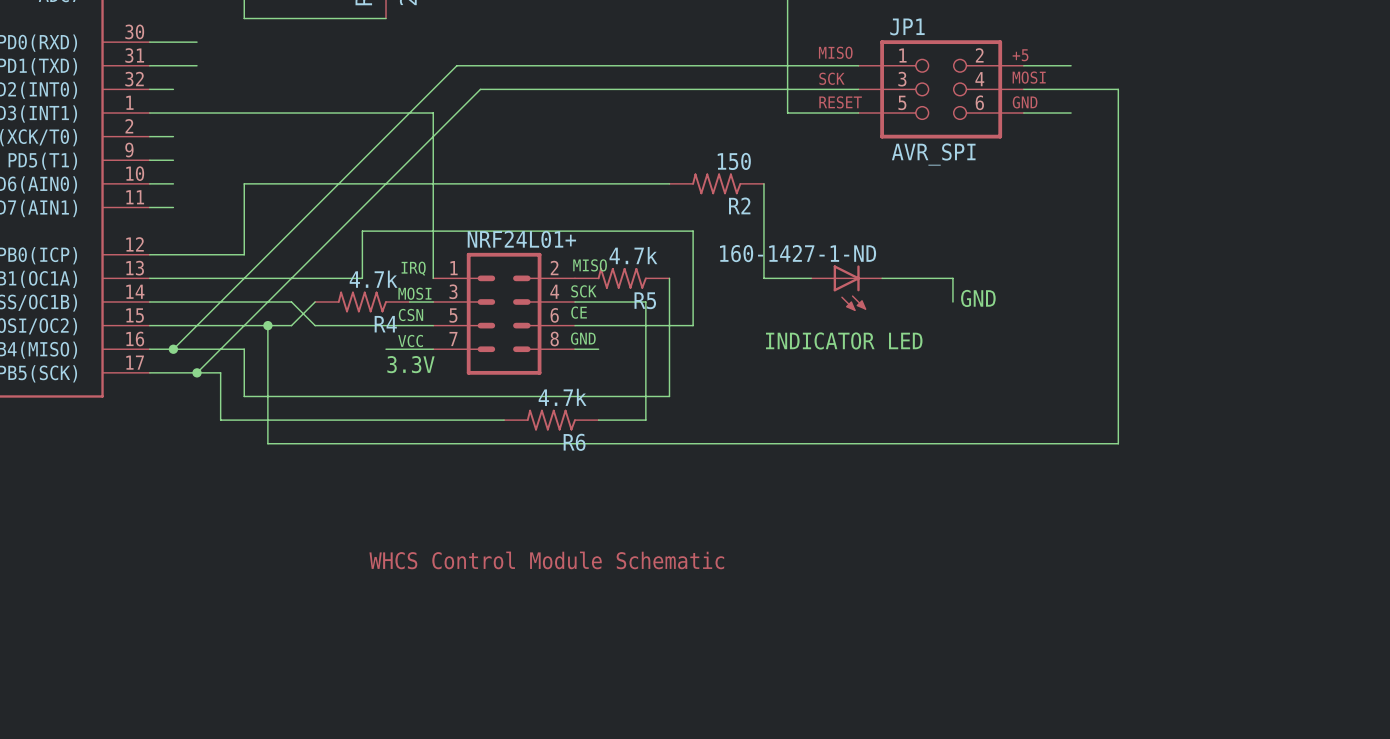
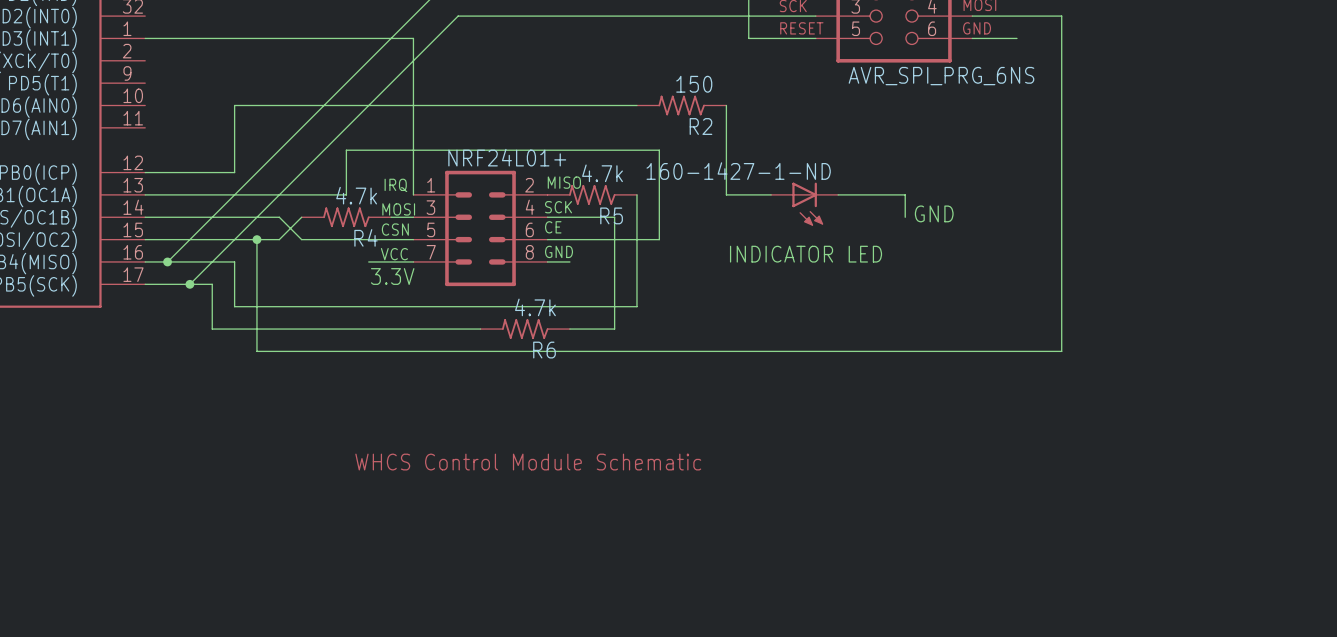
wire: (149, 89) (173, 89) -> none
wire: (149, 136) (173, 136) -> none
JP1 value: AVR_SPI (933, 154) -> AVR_SPI_PRG_6NS (941, 76)
wire: (149, 160) (173, 160) -> none
wire: (149, 183) (173, 183) -> none
wire: (149, 207) (173, 207) -> none

